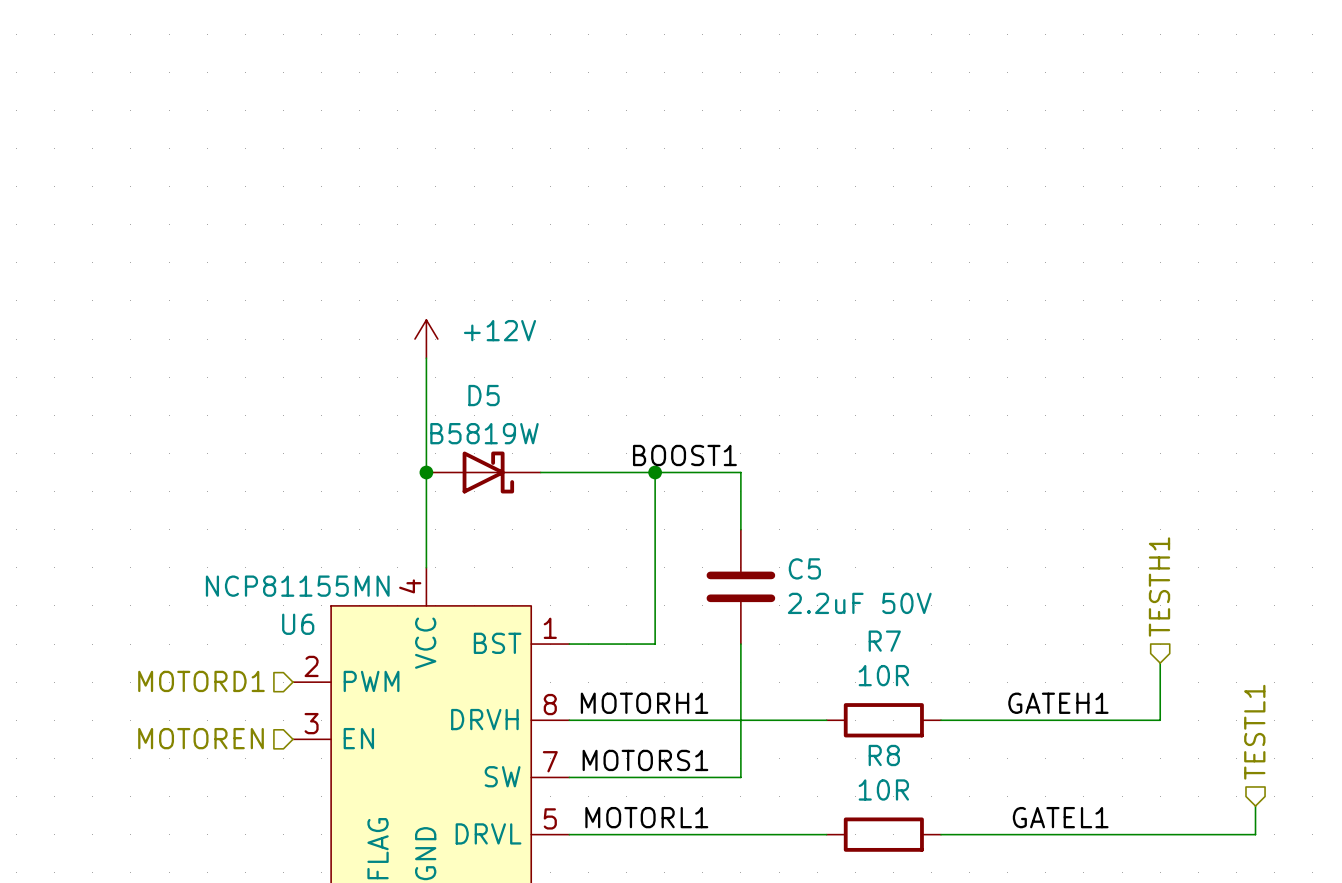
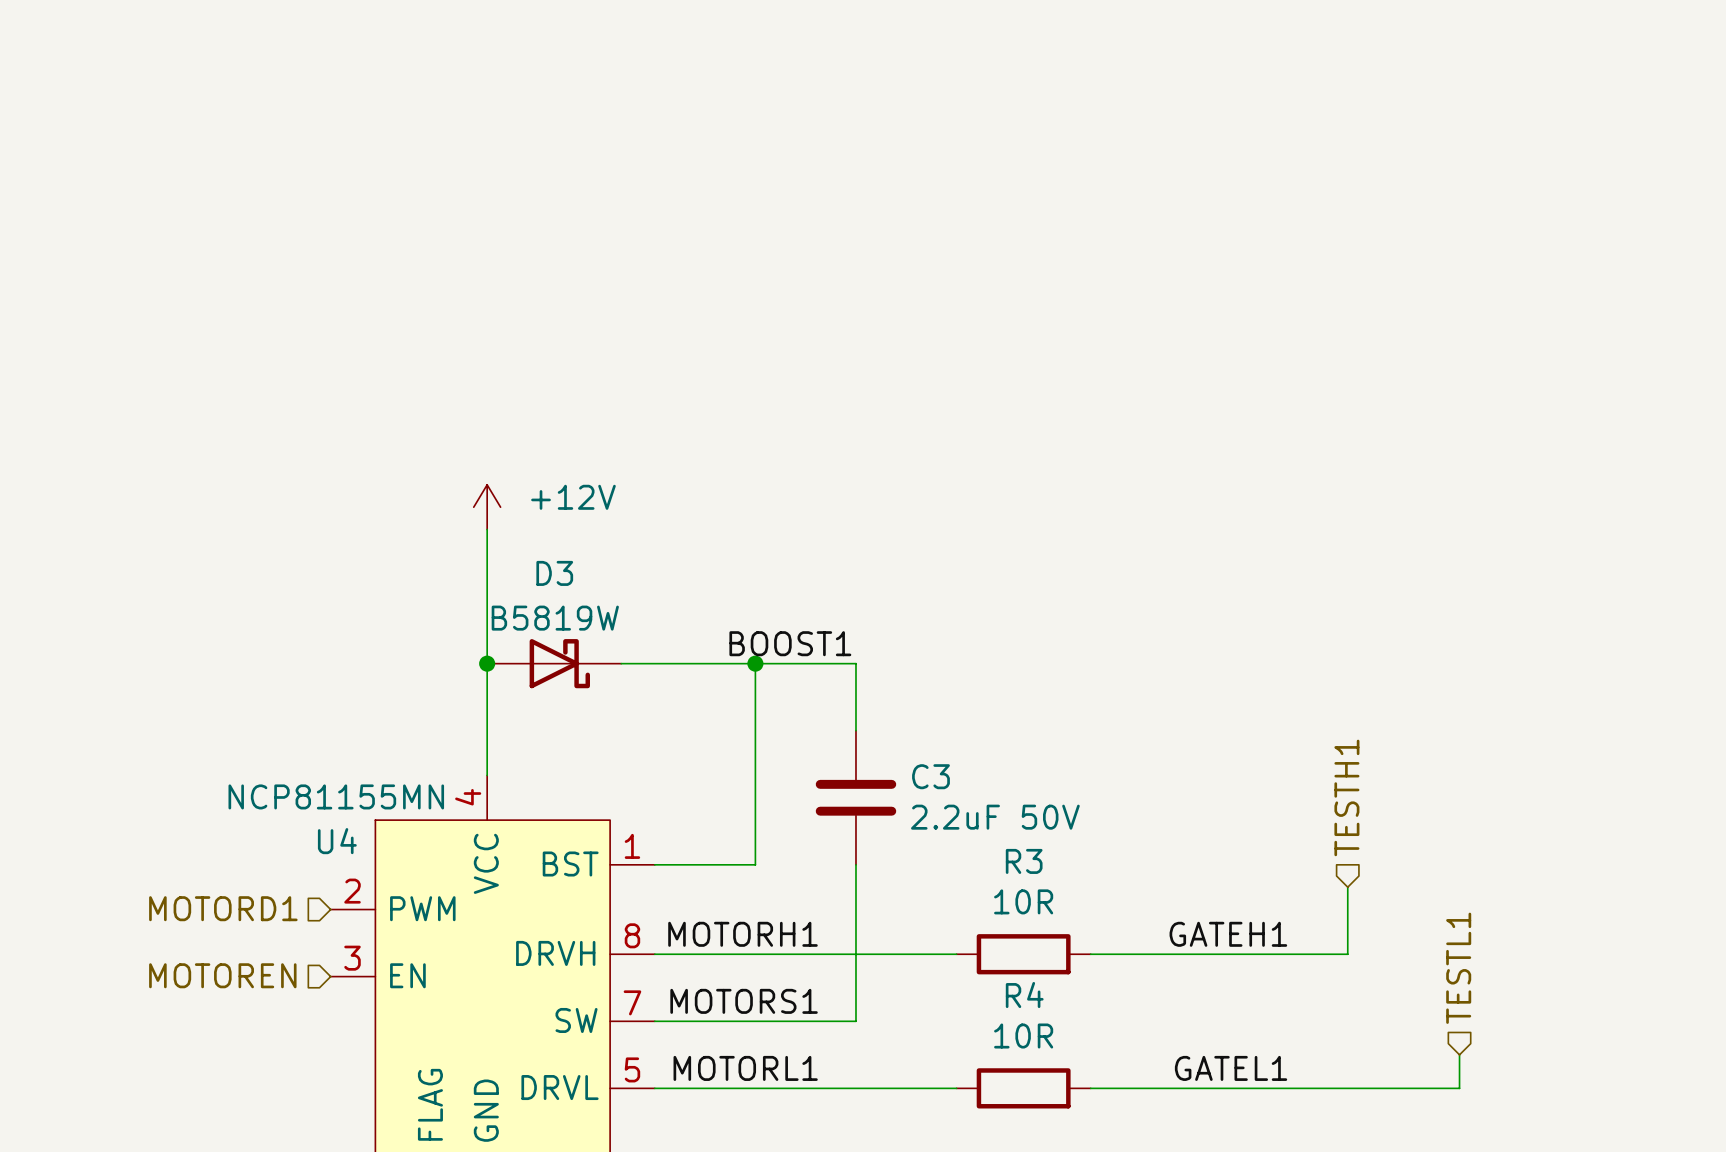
D5 name: D5 (484, 395) -> D3 (554, 573)
C5 name: C5 (804, 568) -> C3 (930, 776)
U6 name: U6 (298, 624) -> U4 (337, 841)
R7 name: R7 (884, 641) -> R3 (1024, 861)
R8 name: R8 (884, 755) -> R4 (1024, 995)

